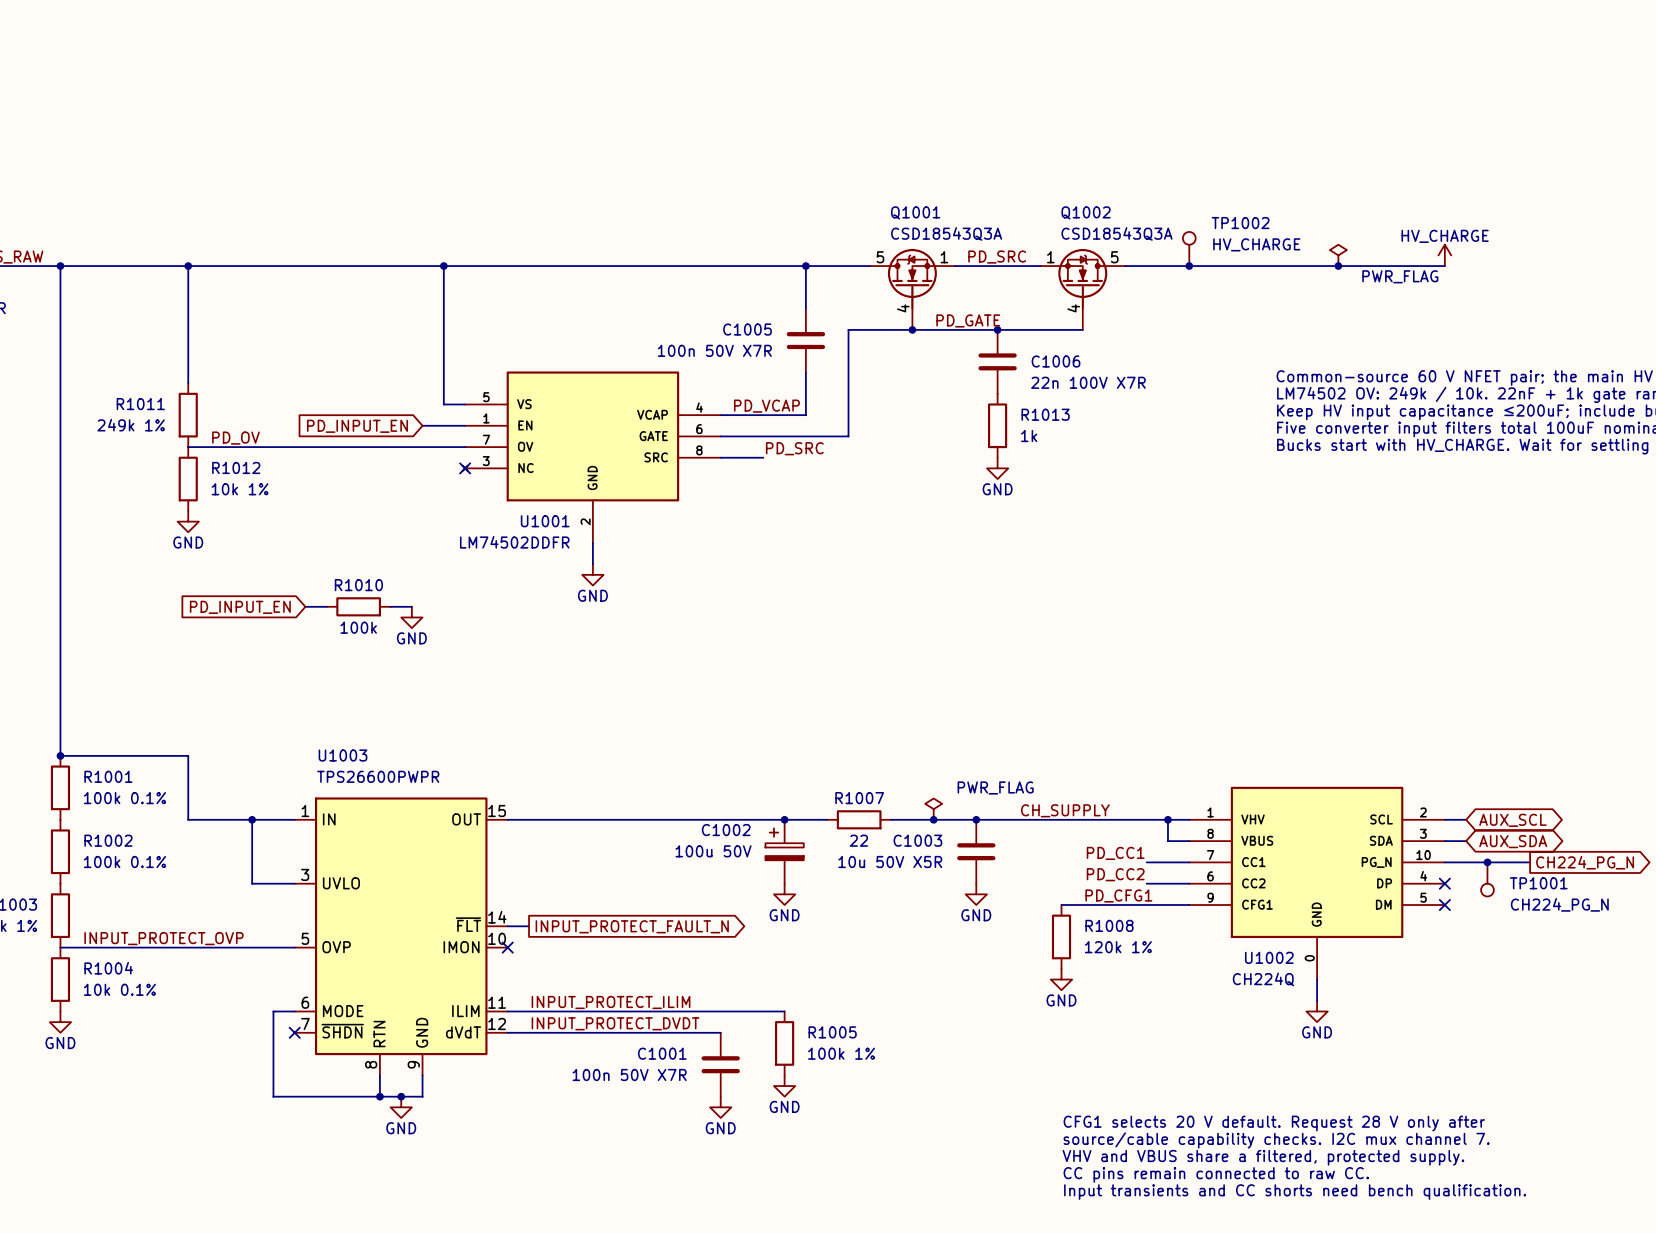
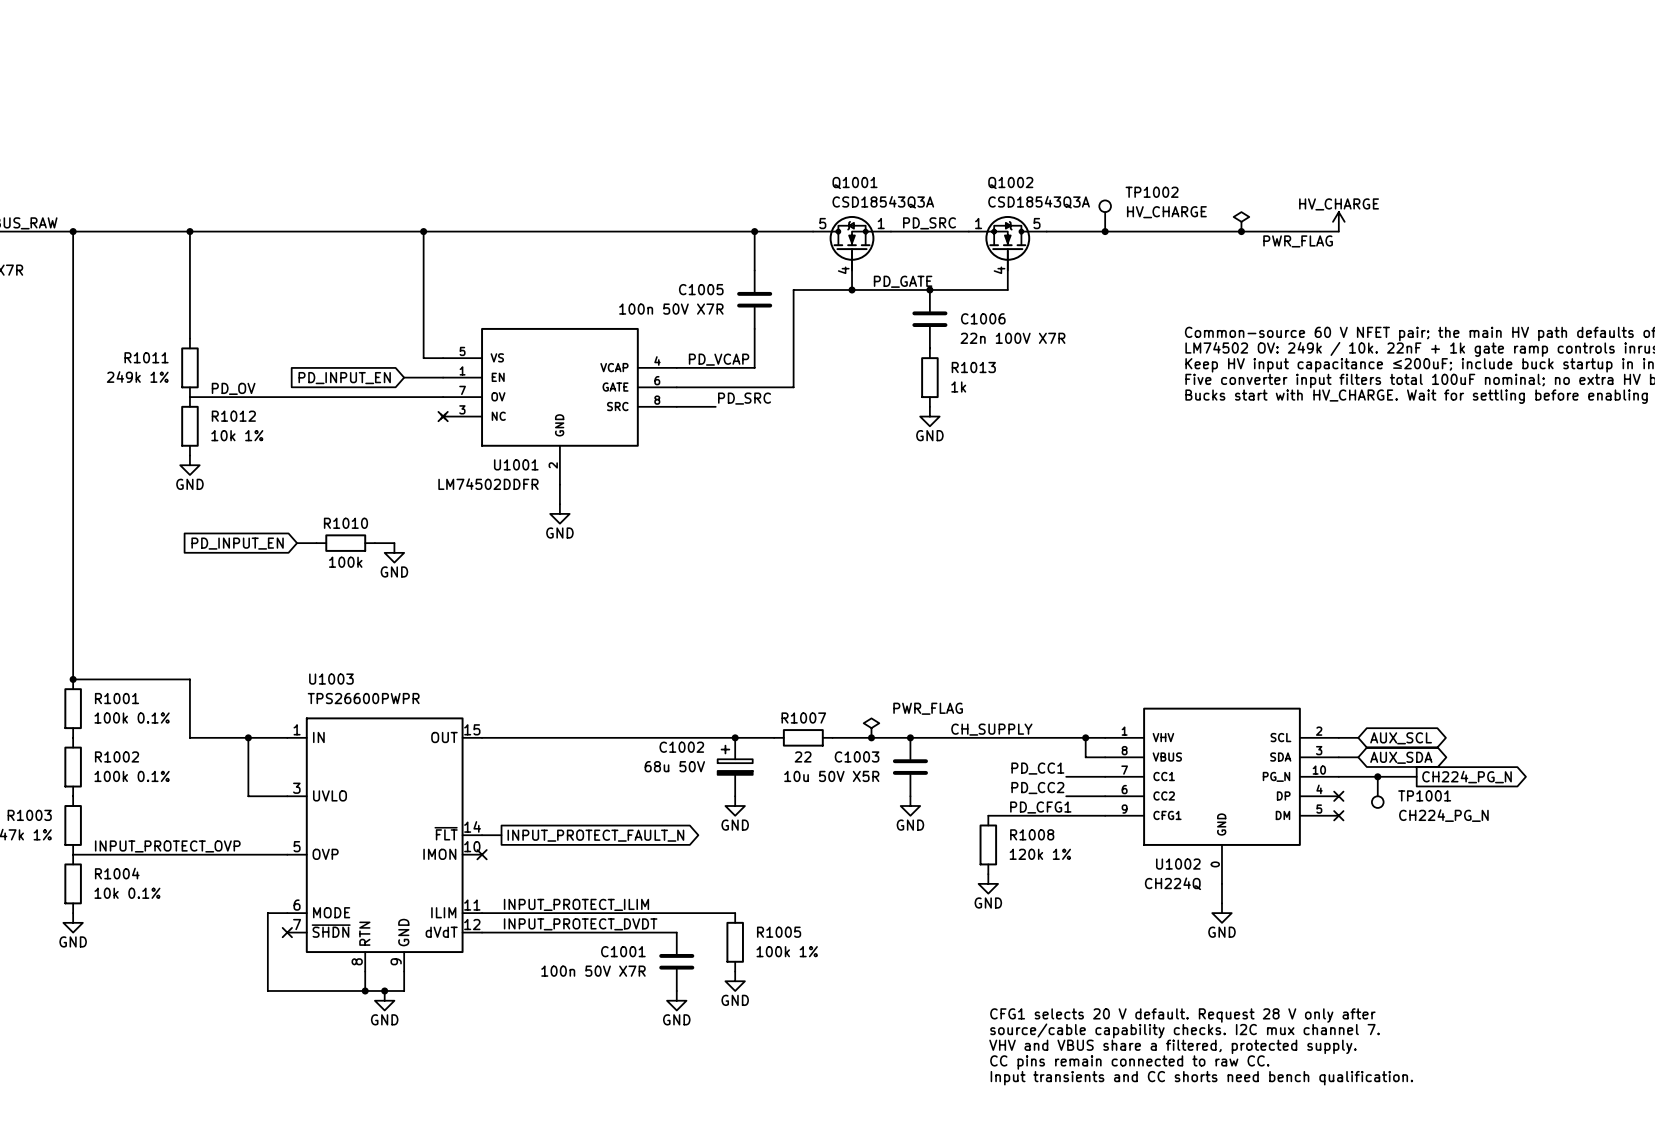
C1002 value: 100u 50V (713, 851) -> 68u 50V (674, 766)

